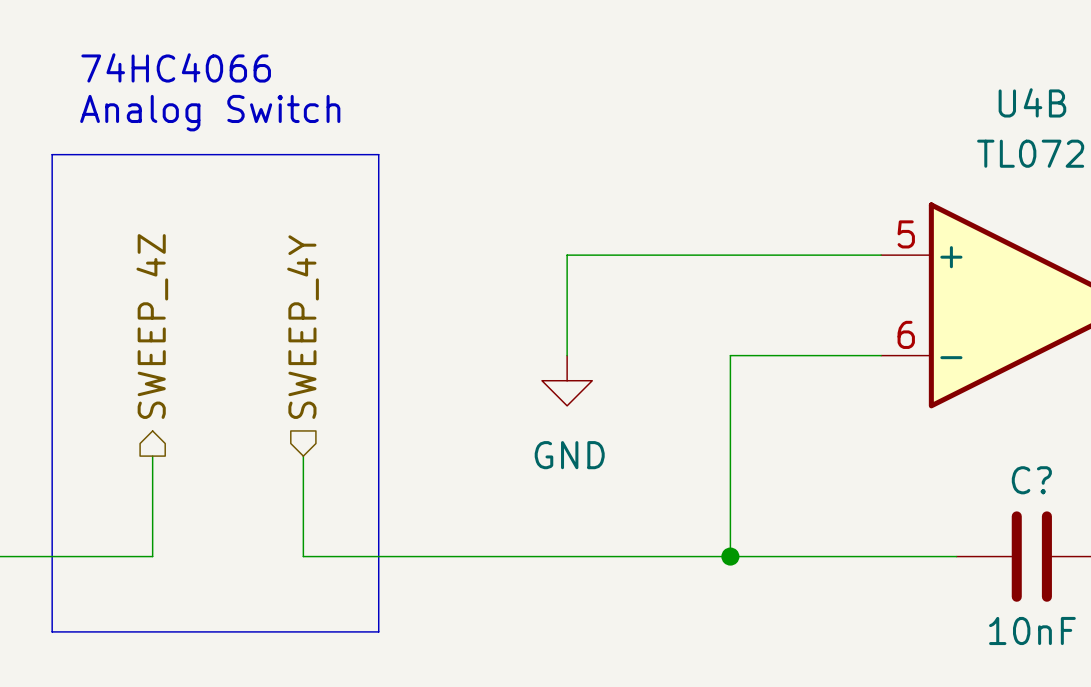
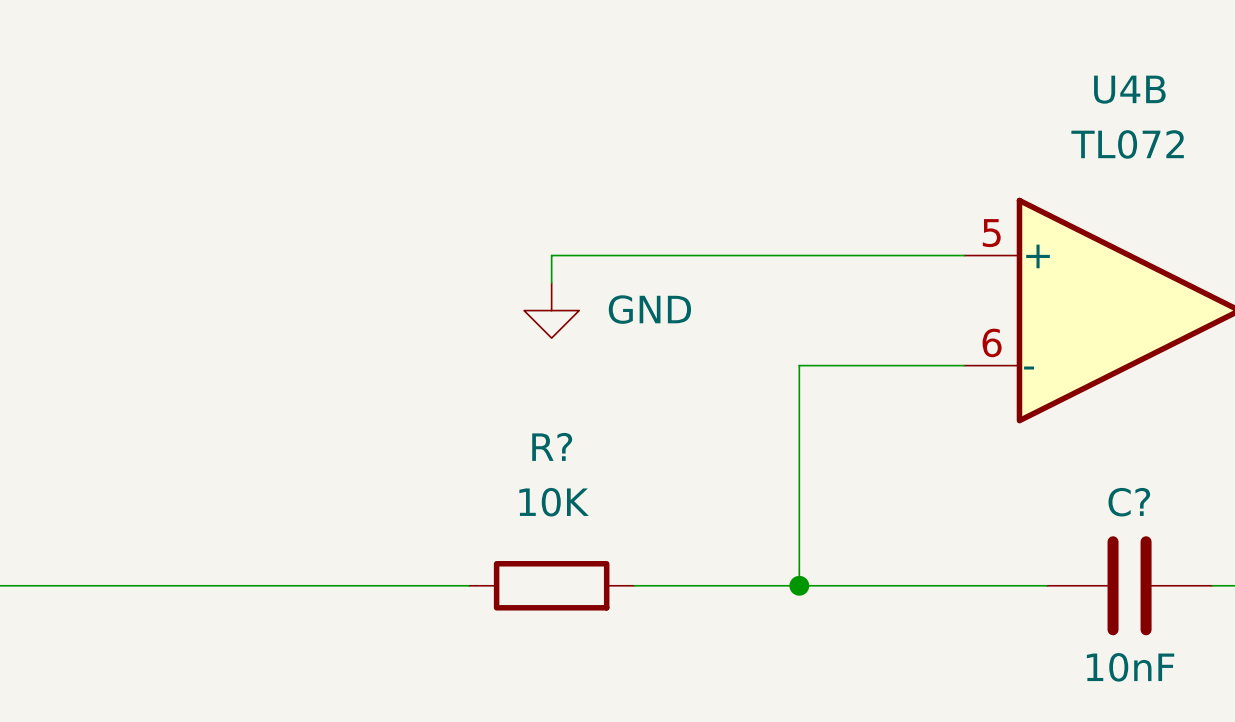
text: 74HC4066 (176, 67) -> none
text: Analog Switch (210, 113) -> none
line: (52, 154) (52, 631) (378, 631) (378, 154) (52, 154) -> none
wire: (567, 255) (567, 355) -> (620, 255) (551, 255) (551, 283)
hierarchical label: SWEEP_4Z (152, 326) -> none
hierarchical label: SWEEP_4Y (303, 327) -> none
power symbol position: GND (567, 380) -> GND (551, 310)
power symbol text position: GND (569, 455) -> GND (649, 309)
wire: (152, 456) (152, 556) -> (331, 585) (166, 585)
wire: (303, 456) (303, 556) -> none
wire: (428, 556) (579, 556) -> none
R?: none -> 10K (551, 585)

